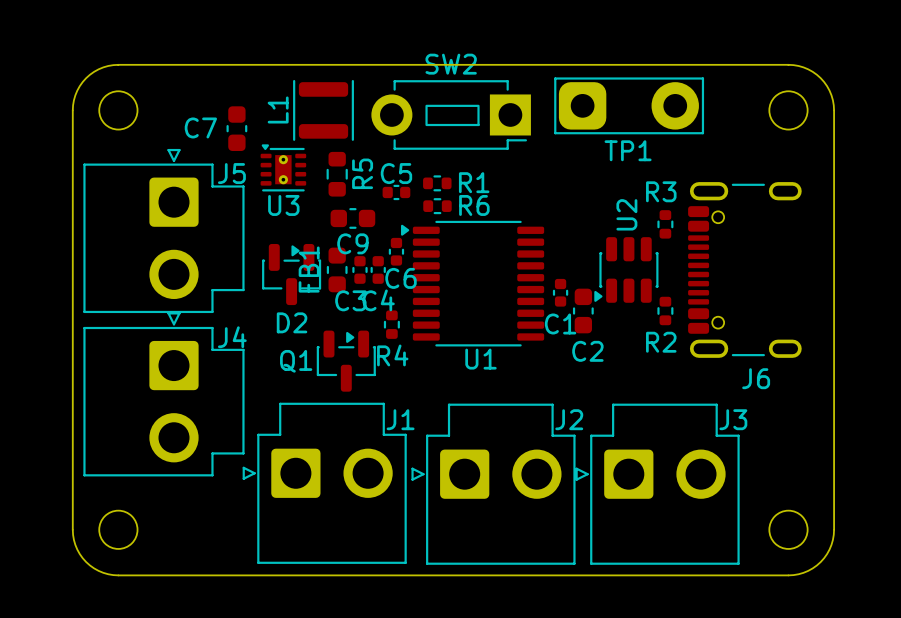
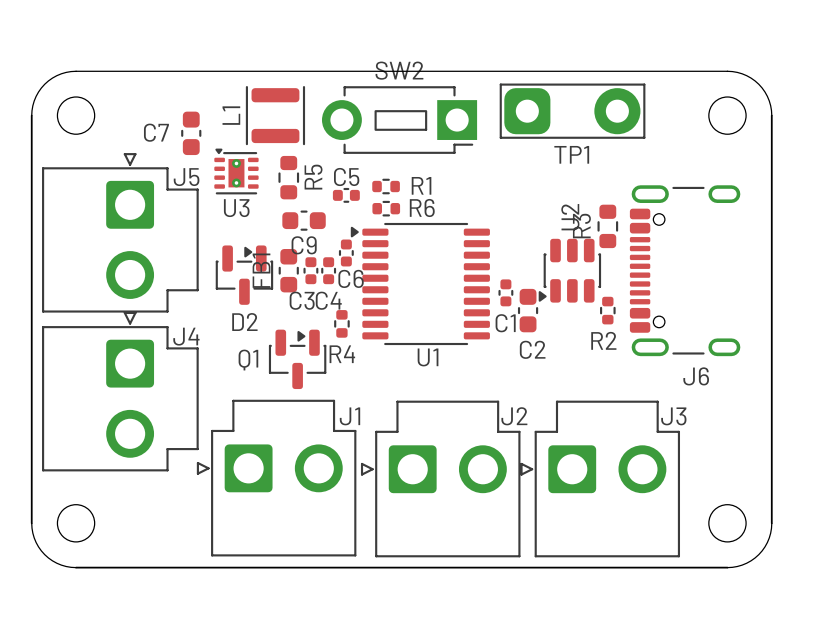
R3 name rotation: 0° (661, 191) -> 90° counterclockwise (581, 226)
R3 footprint: [657, 210, 674, 239] -> [597, 204, 619, 249]

